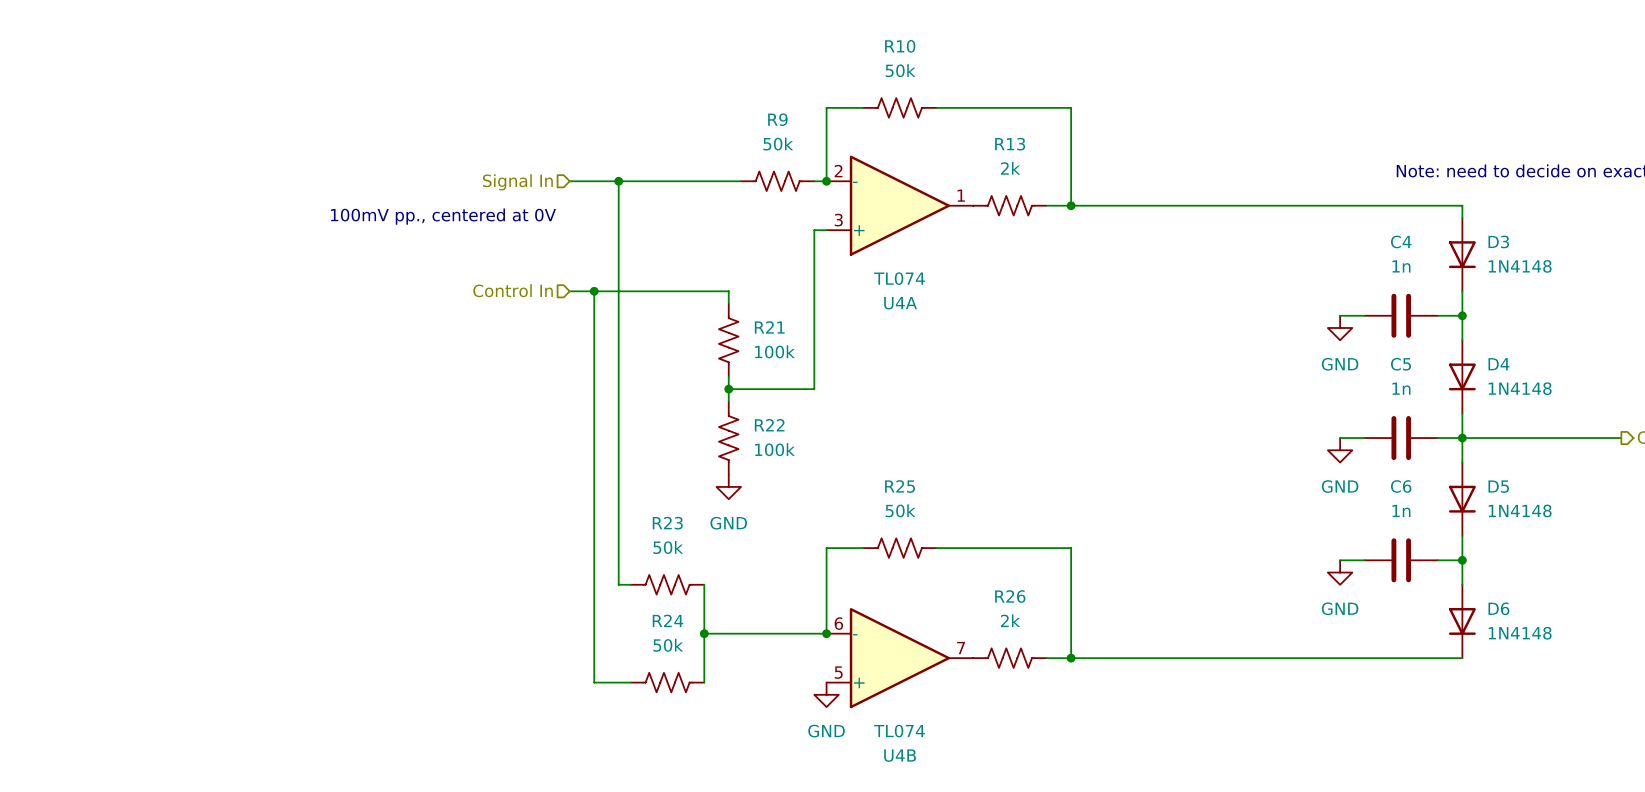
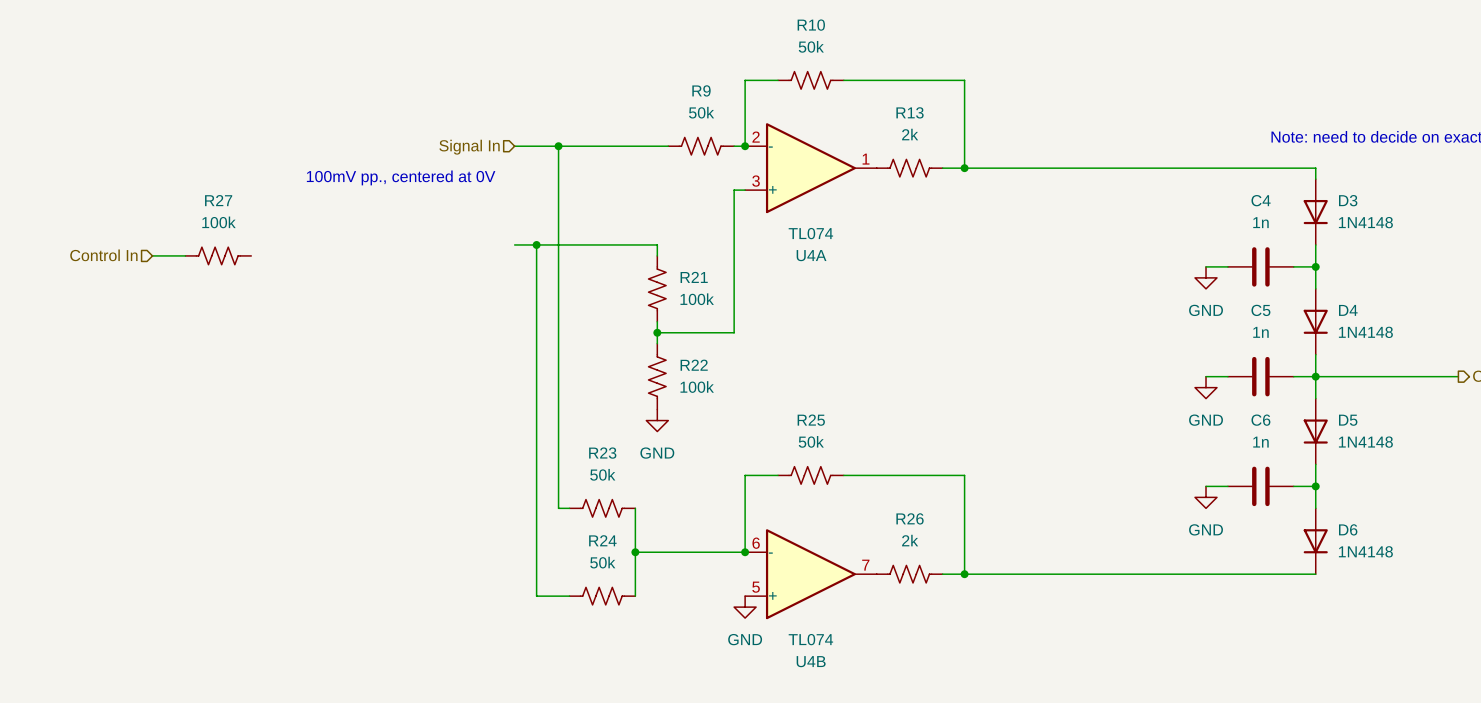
hierarchical label: Control In (513, 290) -> none
hierarchical label: none -> Control In (103, 255)
wire: none -> (152, 255) (185, 255)
R27: none -> 100k (218, 255)

